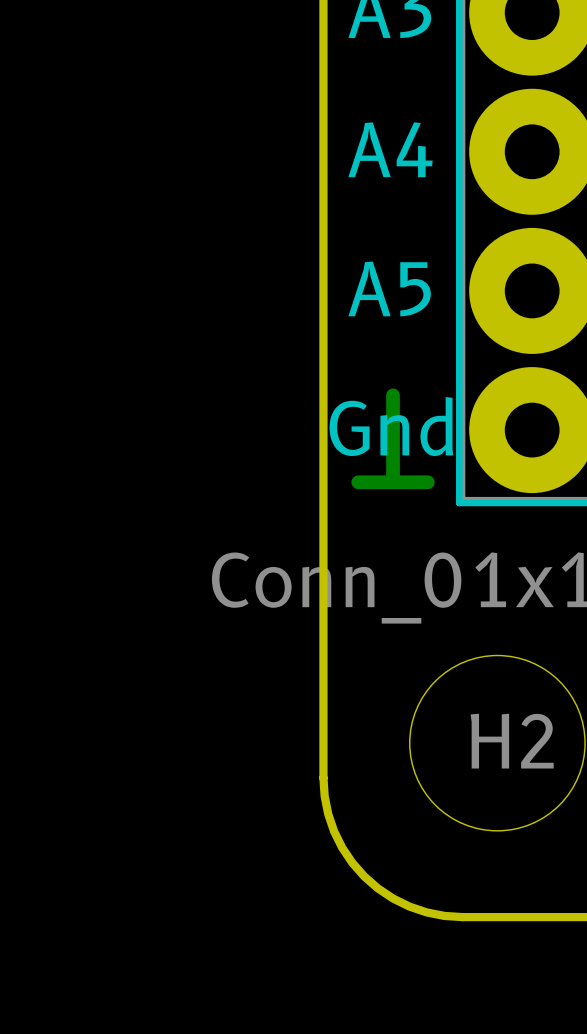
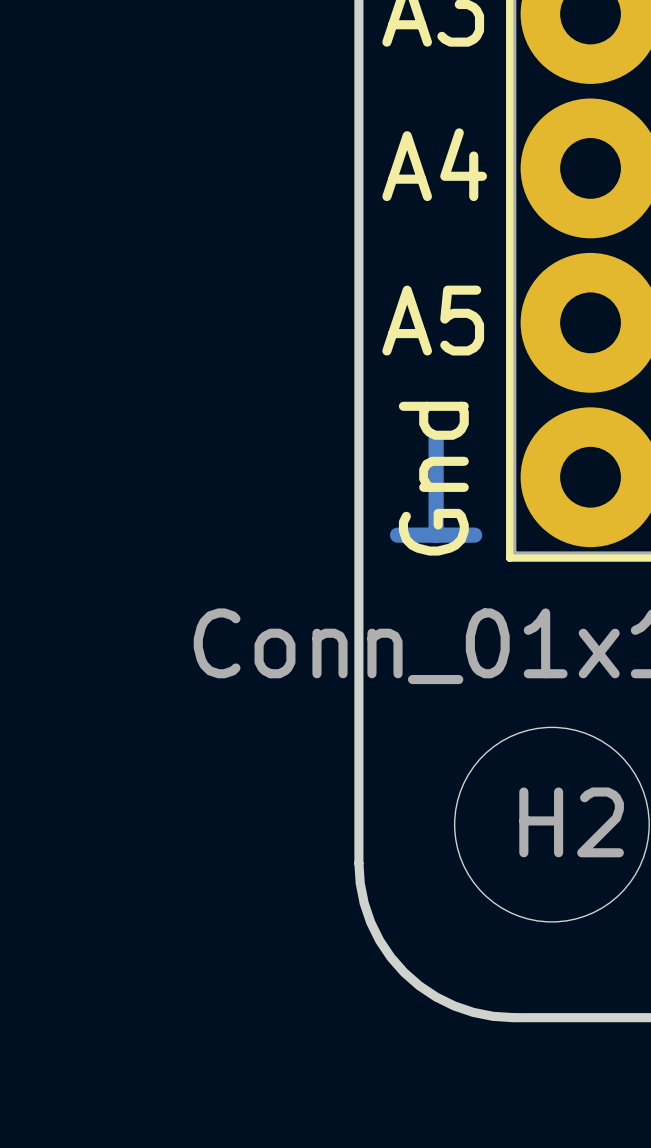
text rotation: 0° (391, 426) -> 90° counterclockwise (433, 478)

